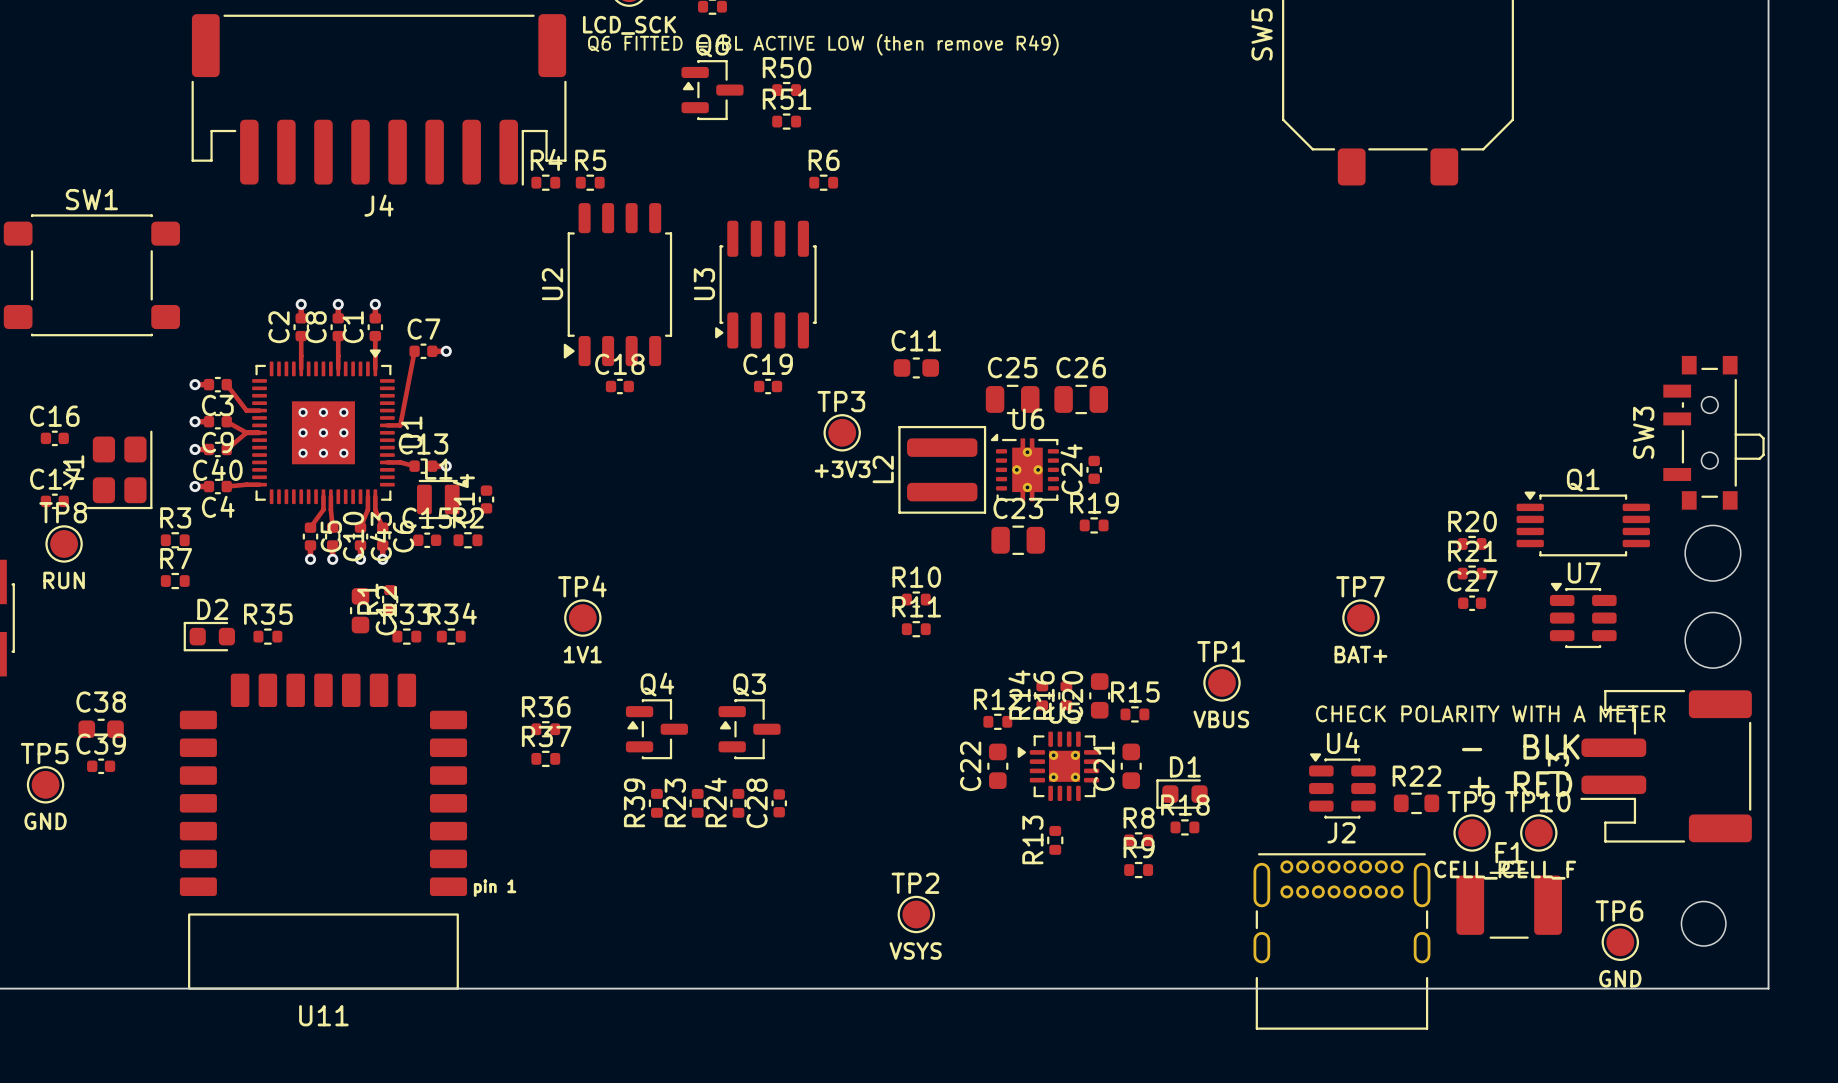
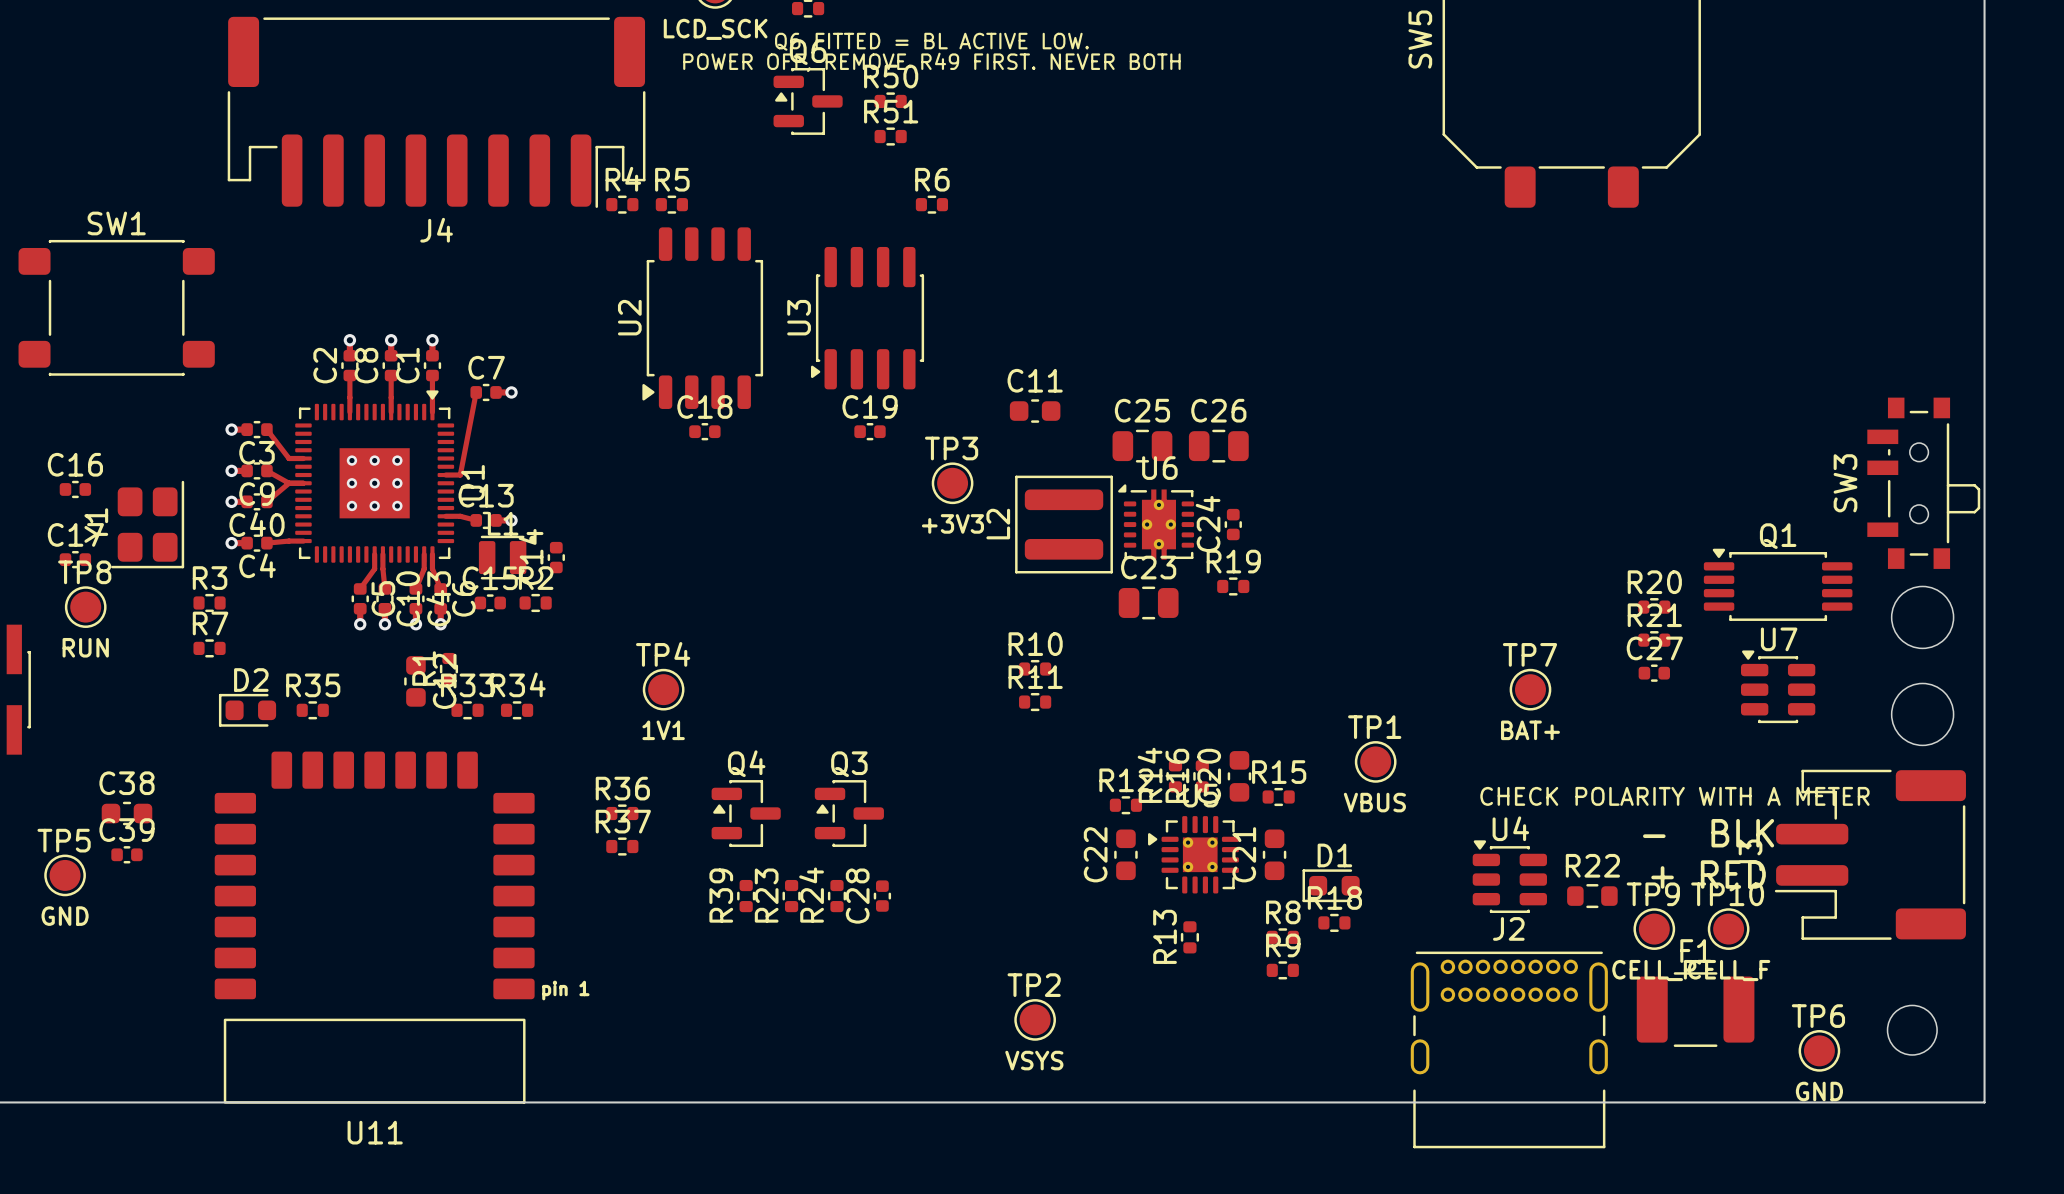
text: Q6 FITTED = BL ACTIVE LOW (then remove R49) (823, 44) -> Q6 FITTED = BL ACTIVE LOW. (931, 41)
text: none -> POWER OFF, REMOVE R49 FIRST. NEVER BOTH (931, 62)

